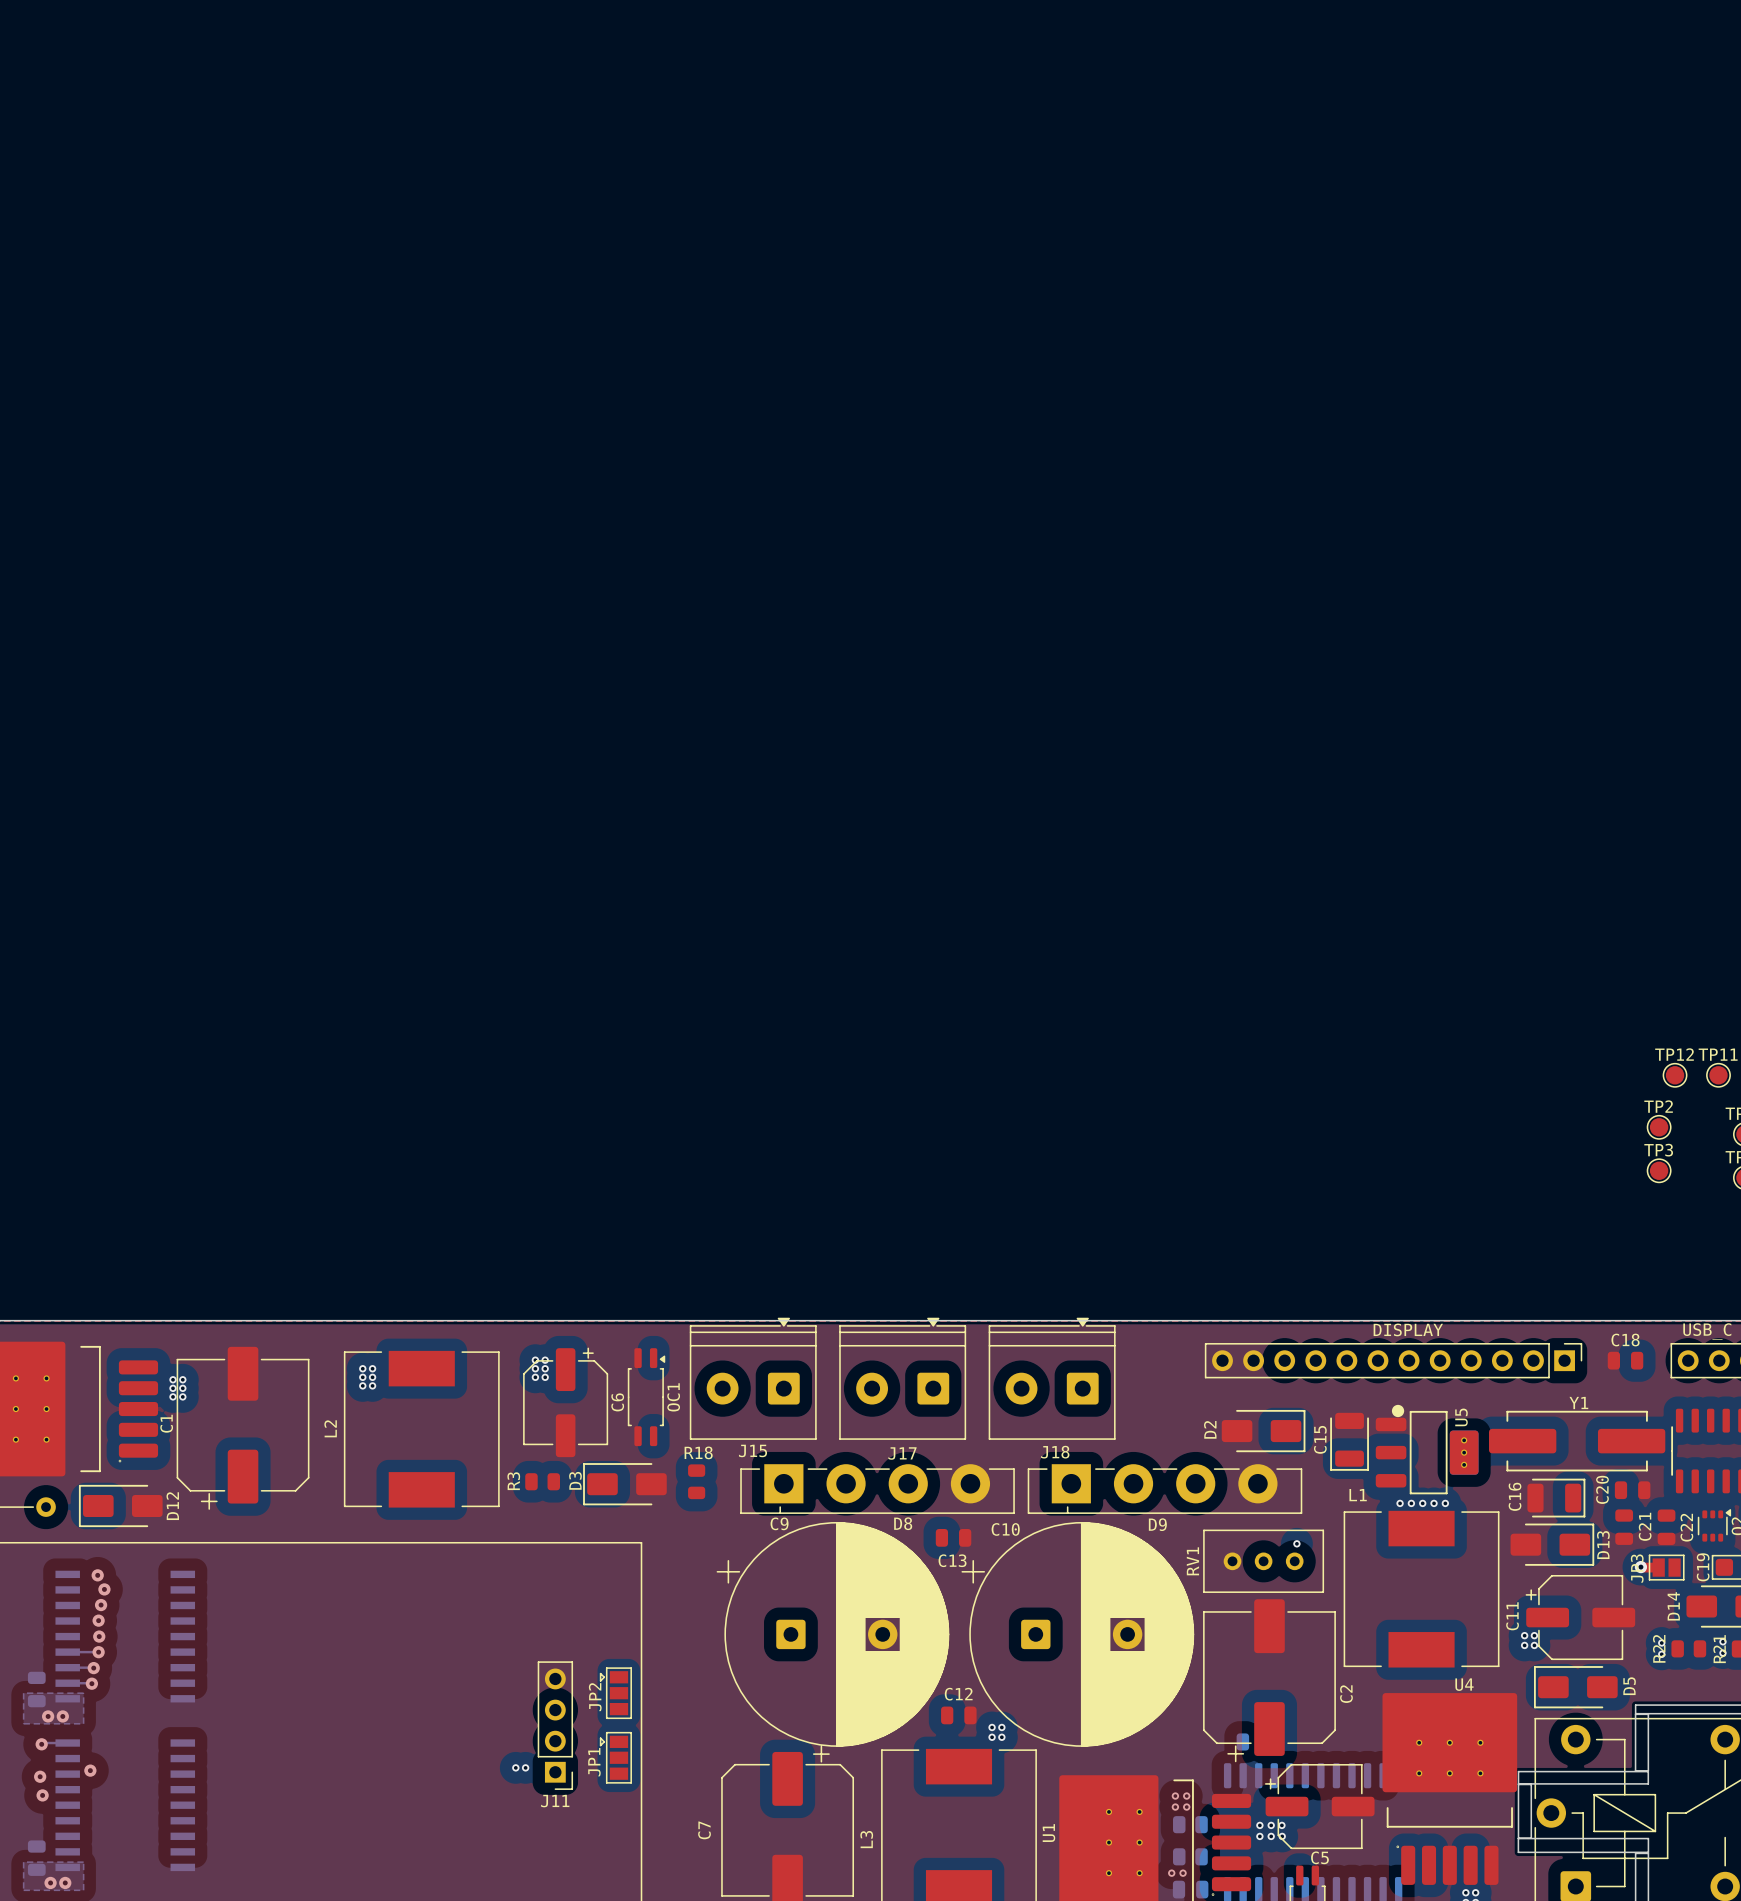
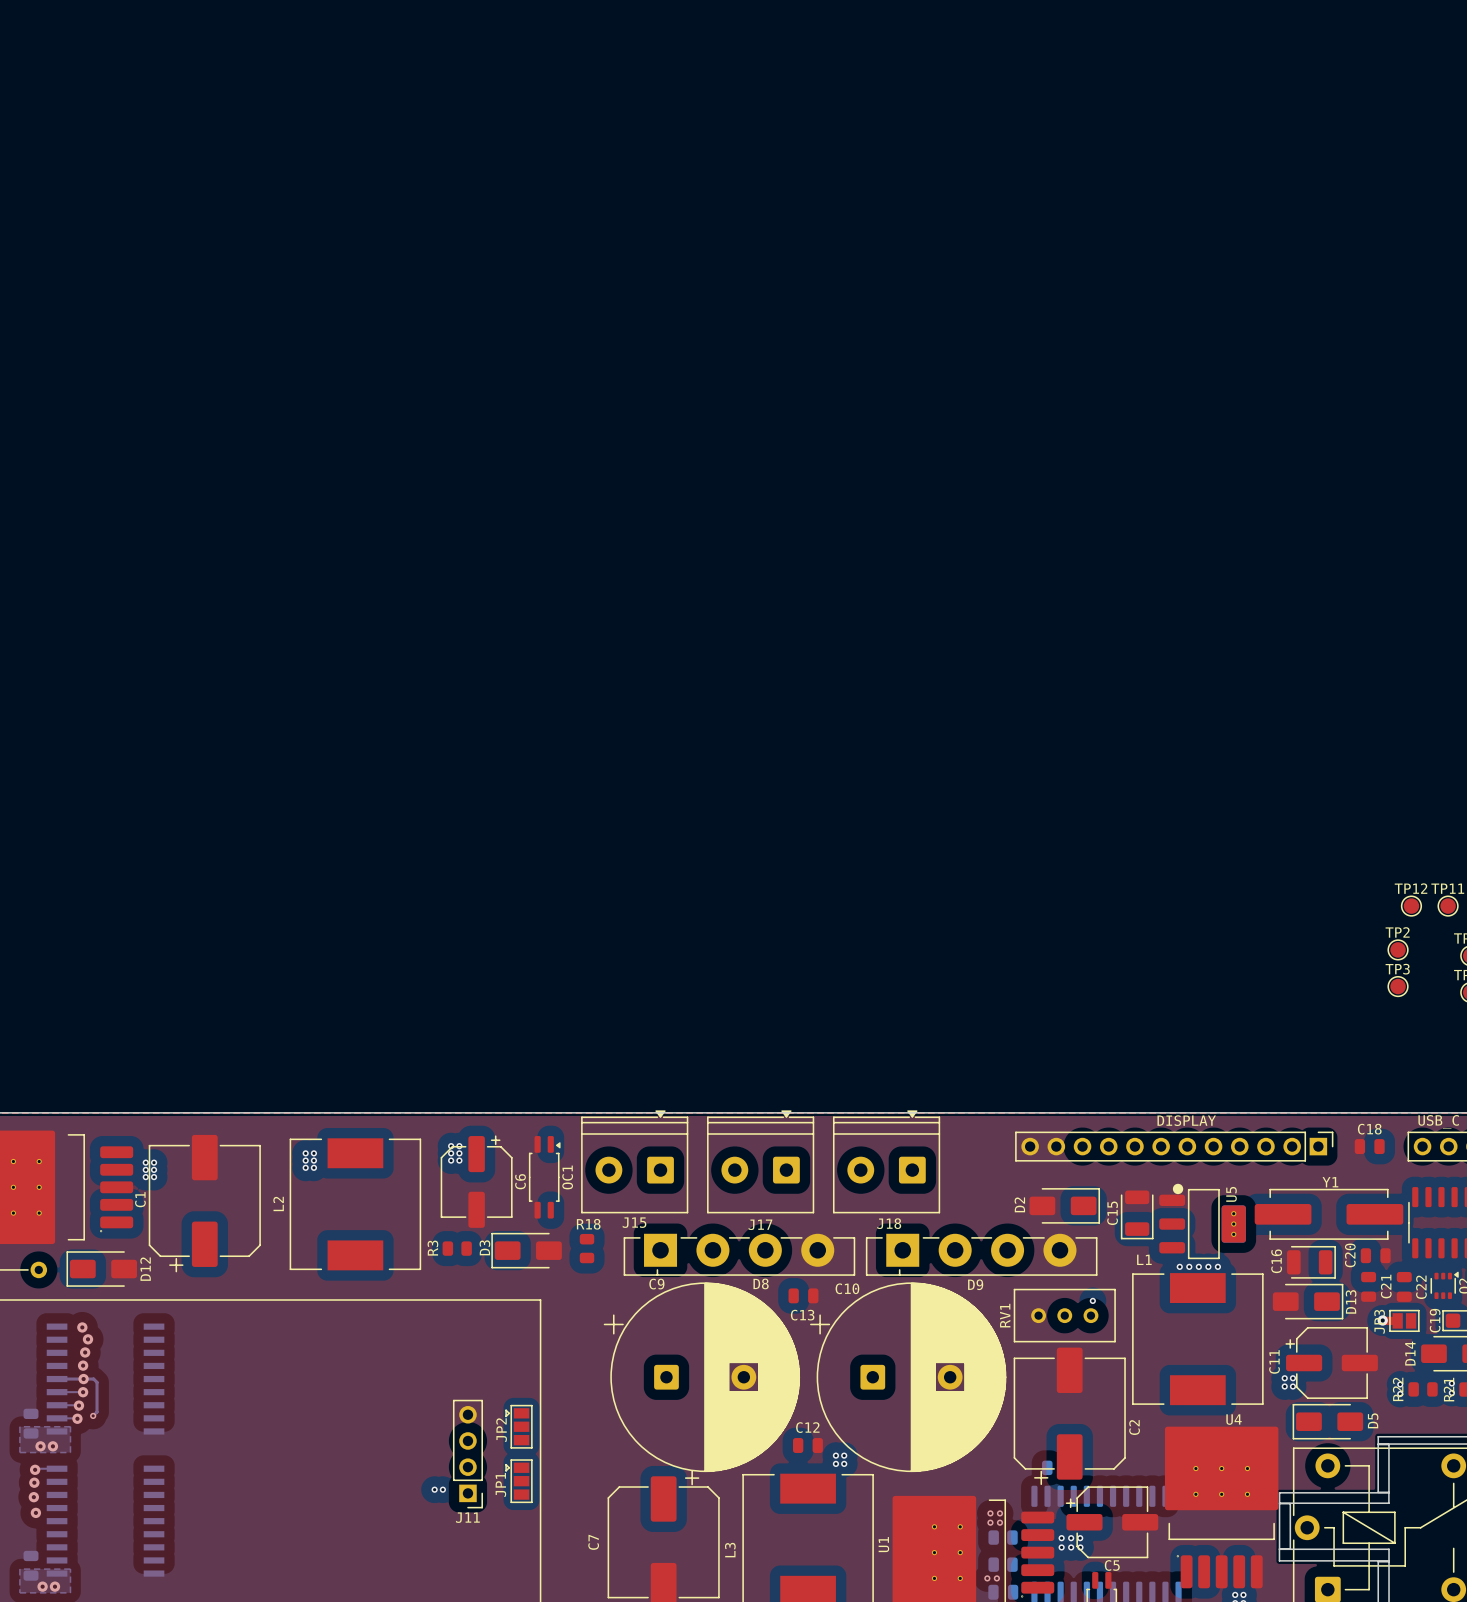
bottom track: none -> (57, 1379) (93, 1379) (97, 1382) (97, 1412) (93, 1415)
via: none -> (93, 1415)
via position: (90, 1770) -> (34, 1482)

